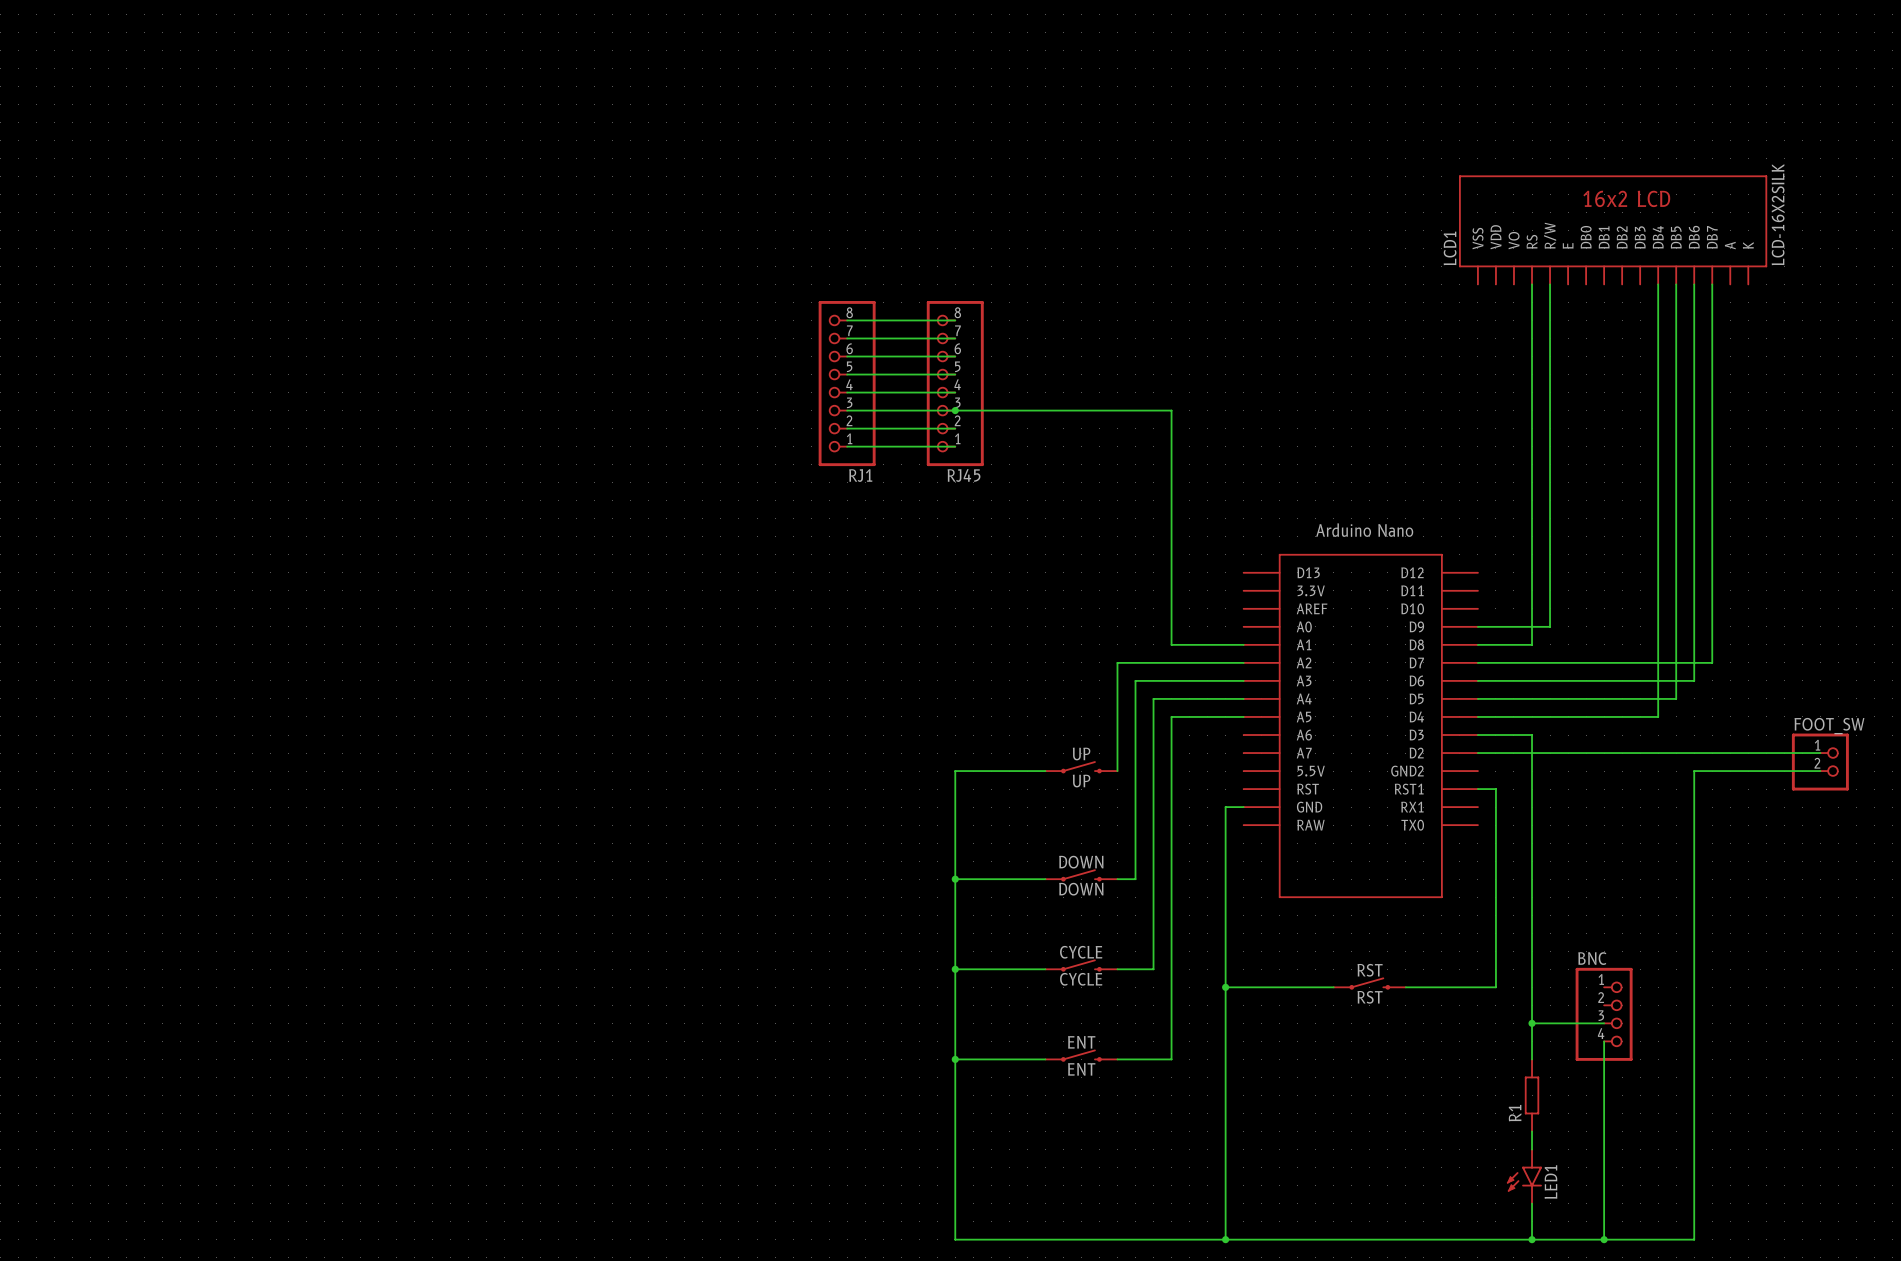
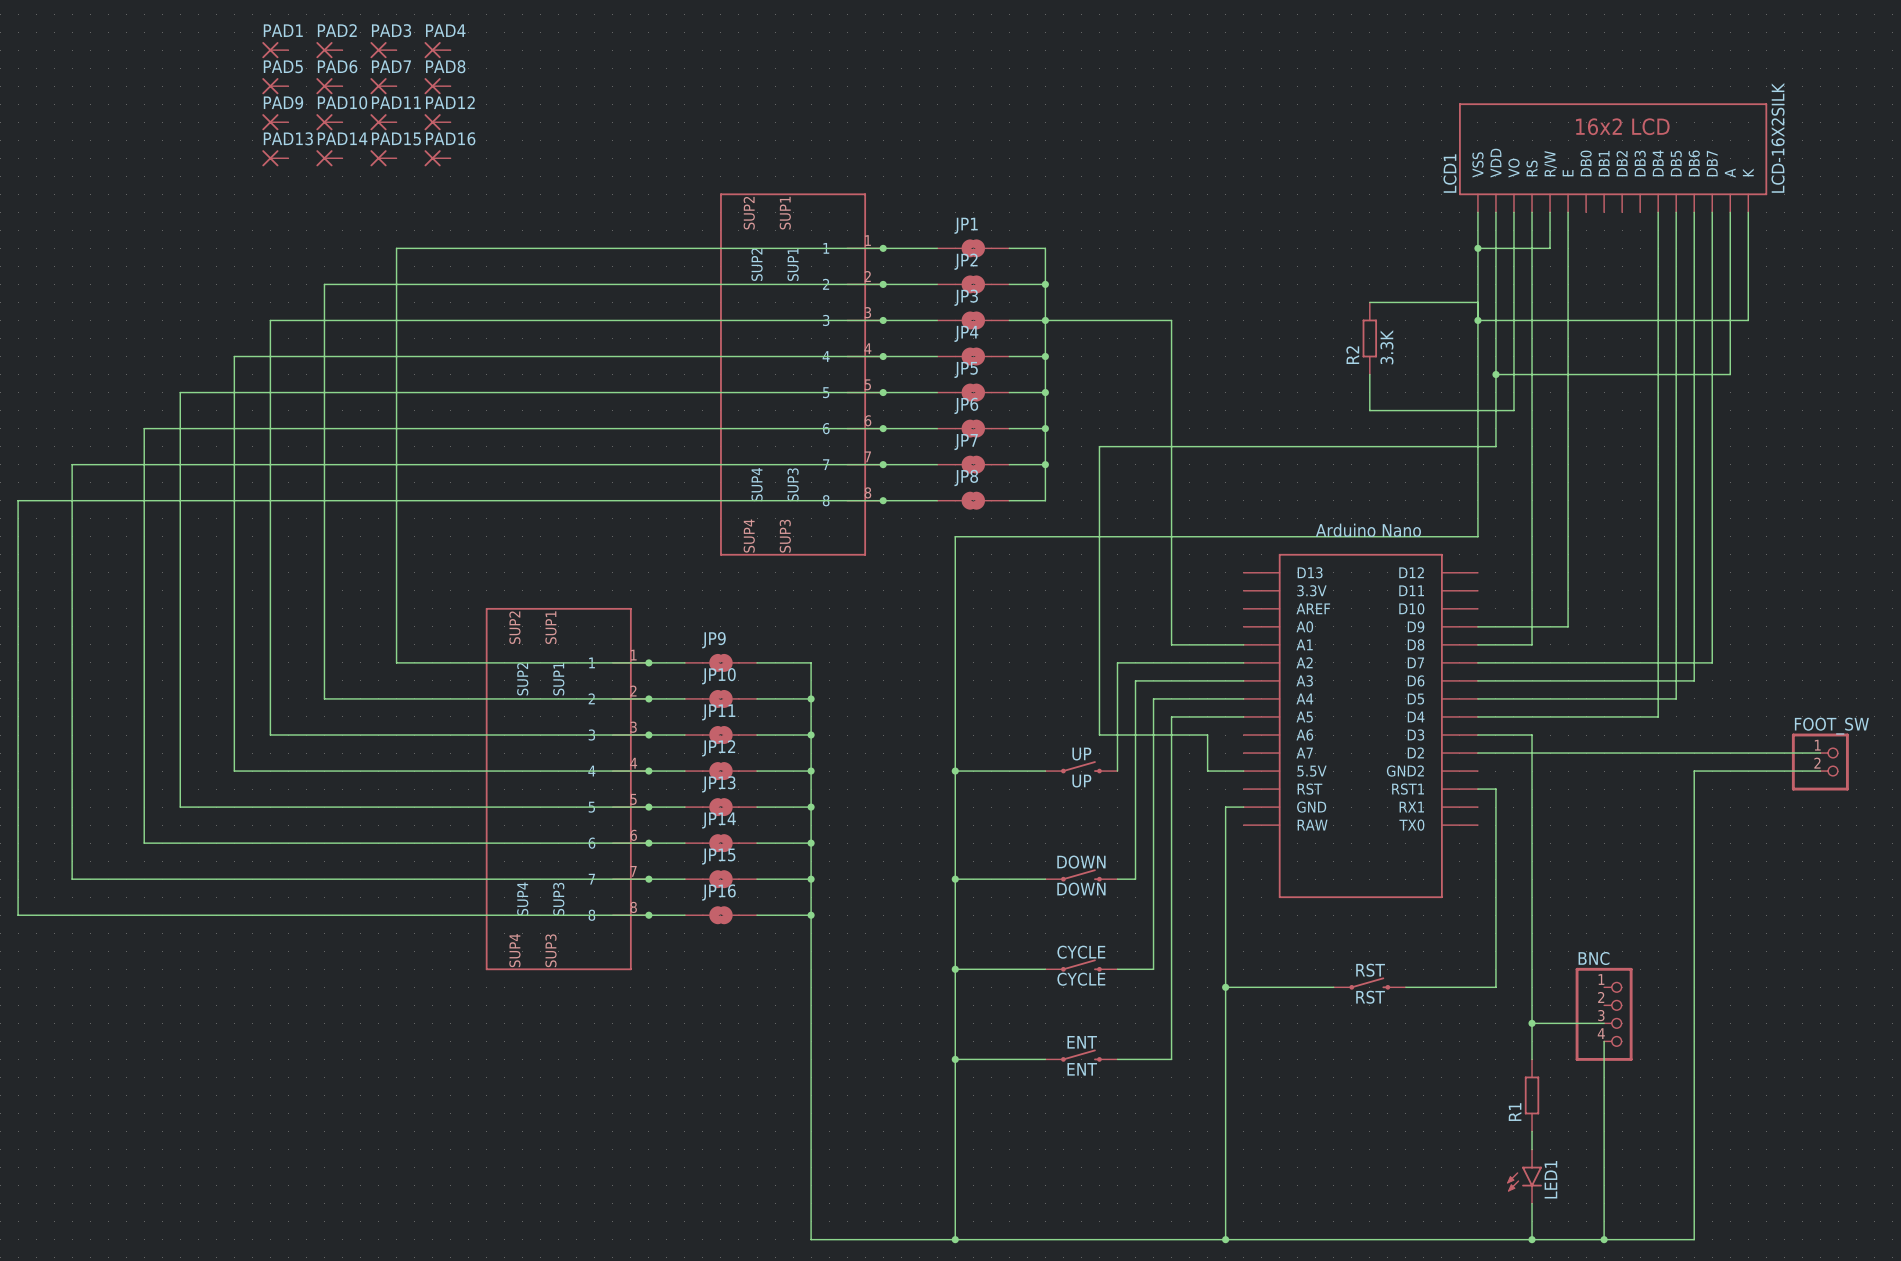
PAD1: none -> (275, 50)
PAD2: none -> (329, 50)
PAD3: none -> (383, 50)
PAD4: none -> (437, 50)
PAD5: none -> (275, 86)
PAD6: none -> (329, 86)
PAD7: none -> (383, 86)
PAD8: none -> (437, 86)
PAD9: none -> (275, 122)
PAD10: none -> (329, 122)
PAD11: none -> (383, 122)
PAD12: none -> (437, 122)
PAD13: none -> (275, 158)
PAD14: none -> (329, 158)
PAD15: none -> (383, 158)
PAD16: none -> (437, 158)
wire: none -> (1477, 212) (1477, 536) (955, 536) (955, 771)
wire: none -> (1495, 212) (1495, 446) (1099, 446) (1099, 735) (1207, 735) (1207, 771) (1243, 771)
wire: none -> (1513, 212) (1513, 410) (1369, 410) (1369, 374)
wire: none -> (1532, 212) (1532, 284)
wire: none -> (1550, 212) (1550, 248) (1477, 248)
wire: none -> (1658, 212) (1658, 284)
wire: none -> (1676, 212) (1676, 284)
wire: none -> (1694, 212) (1694, 284)
wire: none -> (1712, 212) (1712, 284)
wire: none -> (1730, 212) (1730, 374) (1495, 374)
wire: none -> (1748, 212) (1748, 320) (1477, 320)
LCD1 position: (1613, 229) -> (1613, 157)
junction: none -> (883, 248)
wire: none -> (937, 248) (396, 248) (396, 662) (684, 662)
JP1: none -> (973, 248)
wire: none -> (1009, 248) (1045, 248) (1045, 500) (1009, 500)
junction: none -> (1477, 248)
junction: none -> (883, 284)
wire: none -> (937, 284) (324, 284) (324, 698) (684, 698)
JP2: none -> (973, 284)
wire: none -> (1009, 284) (1045, 284)
junction: none -> (1045, 284)
wire: (1550, 284) (1550, 626) -> (1568, 212) (1568, 626) (1550, 626)
wire: none -> (1369, 302) (1477, 302)
wire: none -> (847, 320) (270, 320) (270, 735) (684, 735)
junction: none -> (883, 320)
JP3: none -> (973, 320)
junction: none -> (1045, 320)
junction: none -> (1477, 320)
wire: (847, 338) (955, 338) -> none
R2: none -> 3.3K (1369, 338)
wire: none -> (847, 356) (234, 356) (234, 771) (684, 771)
junction: none -> (883, 356)
JP4: none -> (973, 356)
wire: none -> (1009, 356) (1045, 356)
junction: none -> (1045, 356)
part: none -> (801, 374)
wire: (847, 374) (955, 374) -> none
junction: none -> (1495, 374)
RJ1: (847, 383) -> none
RJ45: (955, 383) -> none
wire: none -> (847, 392) (180, 392) (180, 807) (684, 807)
junction: none -> (883, 392)
JP5: none -> (973, 392)
wire: none -> (1009, 392) (1045, 392)
junction: none -> (1045, 392)
wire: (847, 410) (1171, 410) -> (1009, 320) (1171, 320) (1171, 410)
junction: (955, 410) -> none
wire: none -> (847, 428) (144, 428) (144, 843) (684, 843)
junction: none -> (883, 428)
JP6: none -> (973, 428)
wire: none -> (1009, 428) (1045, 428)
junction: none -> (1045, 428)
wire: (847, 446) (955, 446) -> none
junction: none -> (883, 464)
wire: none -> (937, 464) (72, 464) (72, 879) (684, 879)
JP7: none -> (973, 464)
wire: none -> (1009, 464) (1045, 464)
junction: none -> (1045, 464)
junction: none -> (883, 500)
wire: none -> (937, 500) (18, 500) (18, 915) (684, 915)
JP8: none -> (973, 500)
junction: none -> (648, 662)
JP9: none -> (720, 662)
wire: none -> (757, 662) (811, 662) (811, 1239) (955, 1239)
junction: none -> (648, 698)
JP10: none -> (720, 698)
wire: none -> (757, 698) (811, 698)
junction: none -> (811, 698)
junction: none -> (648, 735)
JP11: none -> (720, 735)
wire: none -> (757, 735) (811, 735)
junction: none -> (811, 735)
junction: none -> (648, 771)
JP12: none -> (720, 771)
wire: none -> (757, 771) (811, 771)
junction: none -> (811, 771)
junction: none -> (955, 771)
part: none -> (567, 789)
junction: none -> (648, 807)
JP13: none -> (720, 807)
wire: none -> (757, 807) (811, 807)
junction: none -> (811, 807)
junction: none -> (648, 843)
JP14: none -> (720, 843)
wire: none -> (757, 843) (811, 843)
junction: none -> (811, 843)
junction: none -> (648, 879)
JP15: none -> (720, 879)
wire: none -> (757, 879) (811, 879)
junction: none -> (811, 879)
junction: none -> (648, 915)
JP16: none -> (720, 915)
wire: none -> (757, 915) (811, 915)
junction: none -> (811, 915)
junction: none -> (955, 1239)

